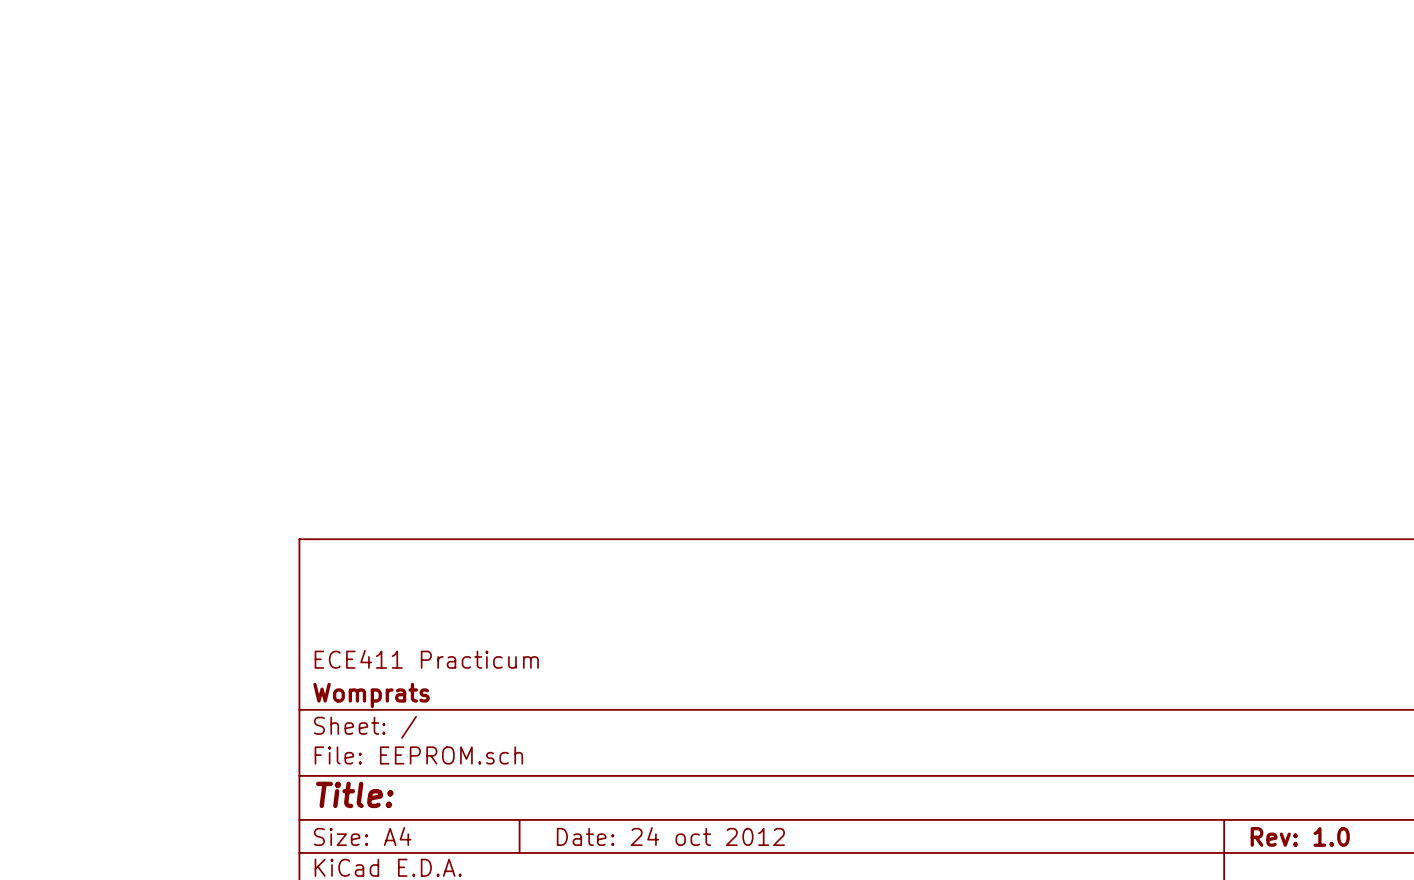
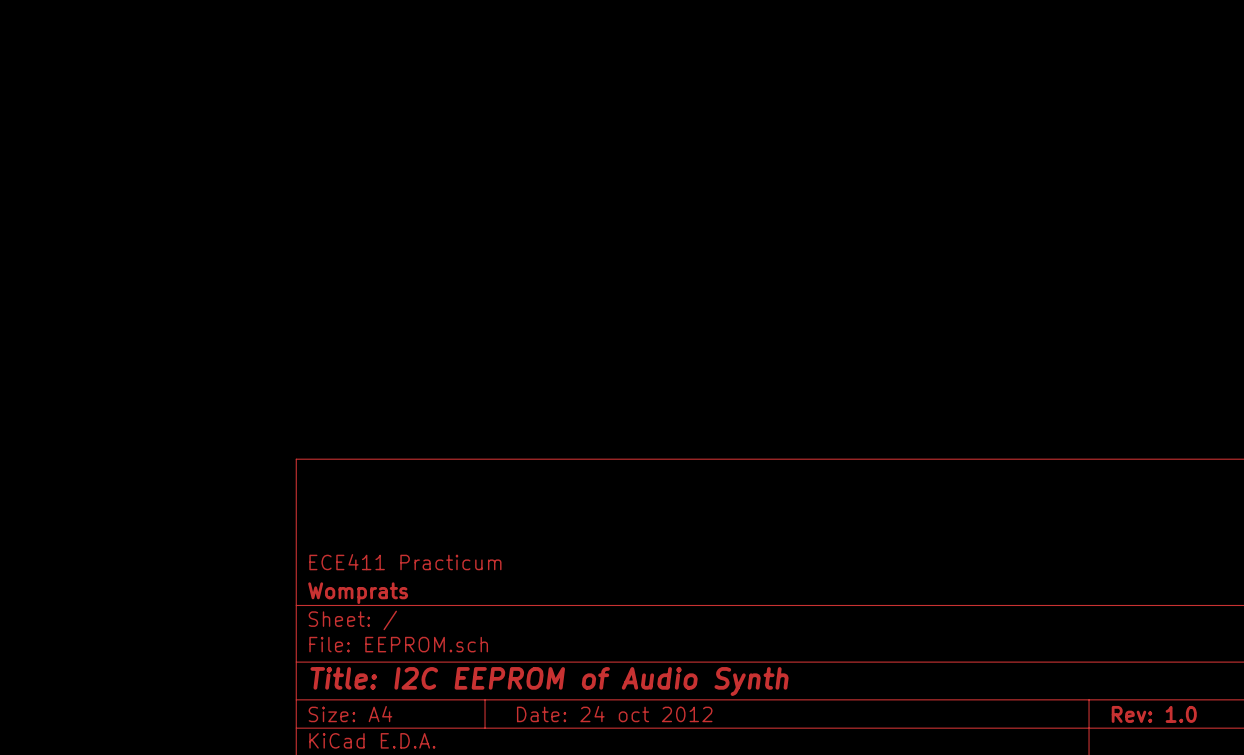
title block: Title: (354, 794) -> Title: I2C EEPROM of Audio Synth (549, 681)

